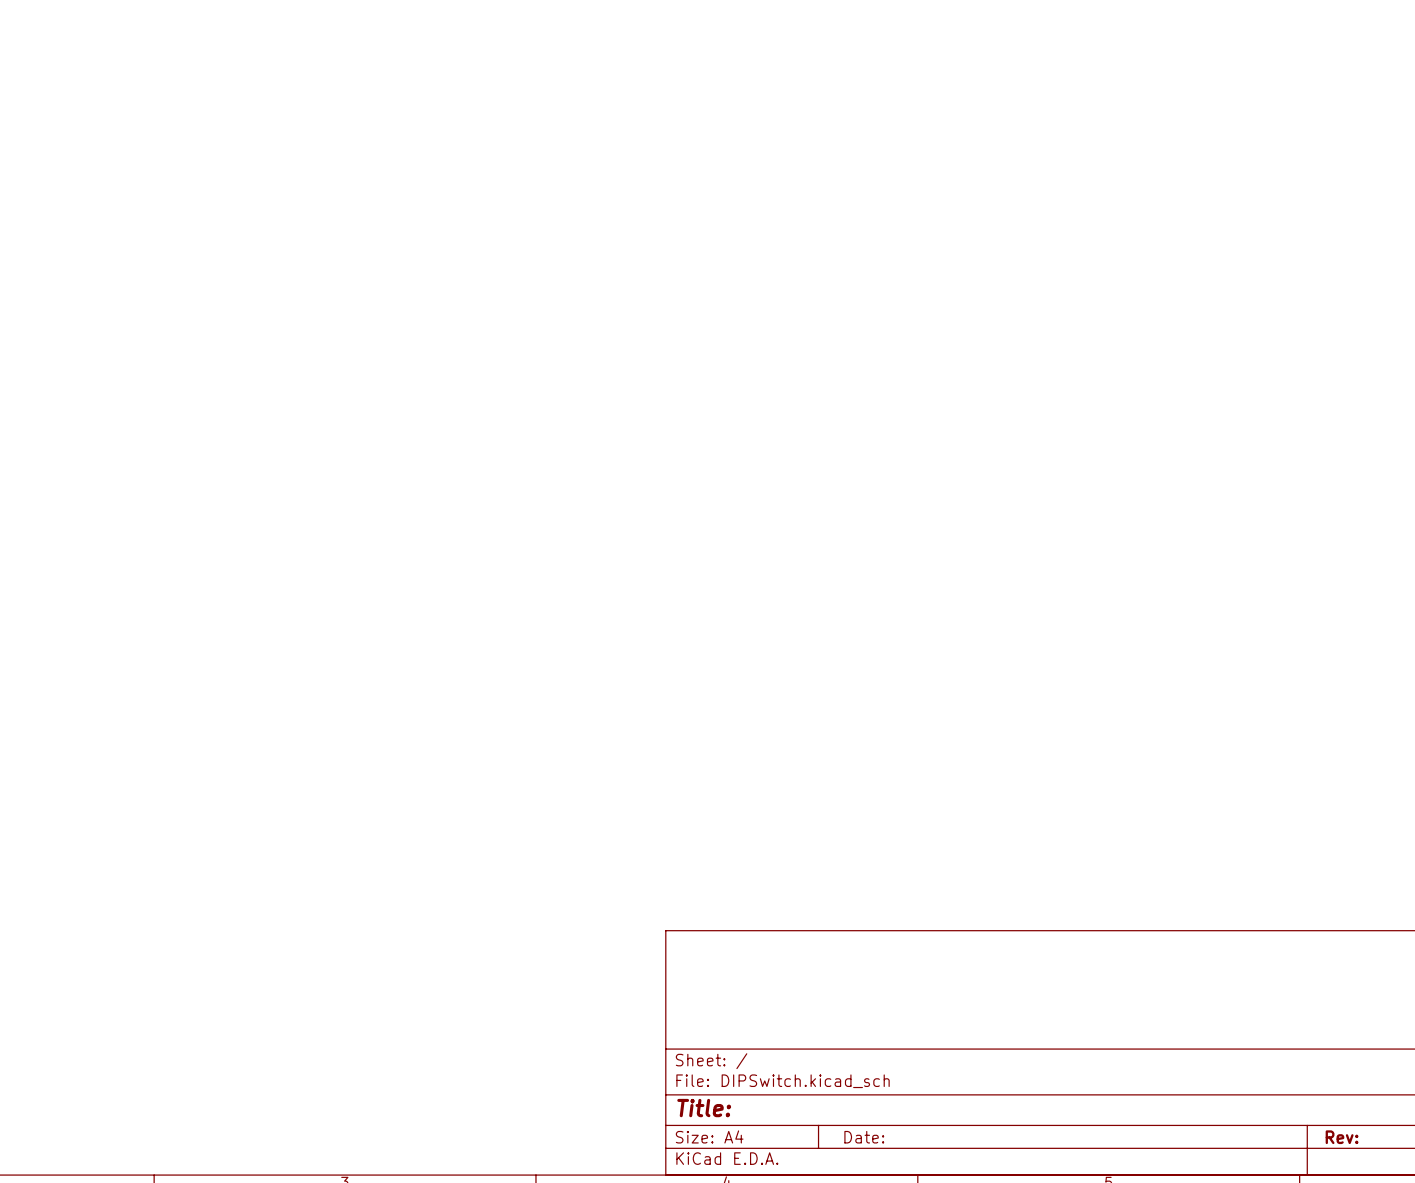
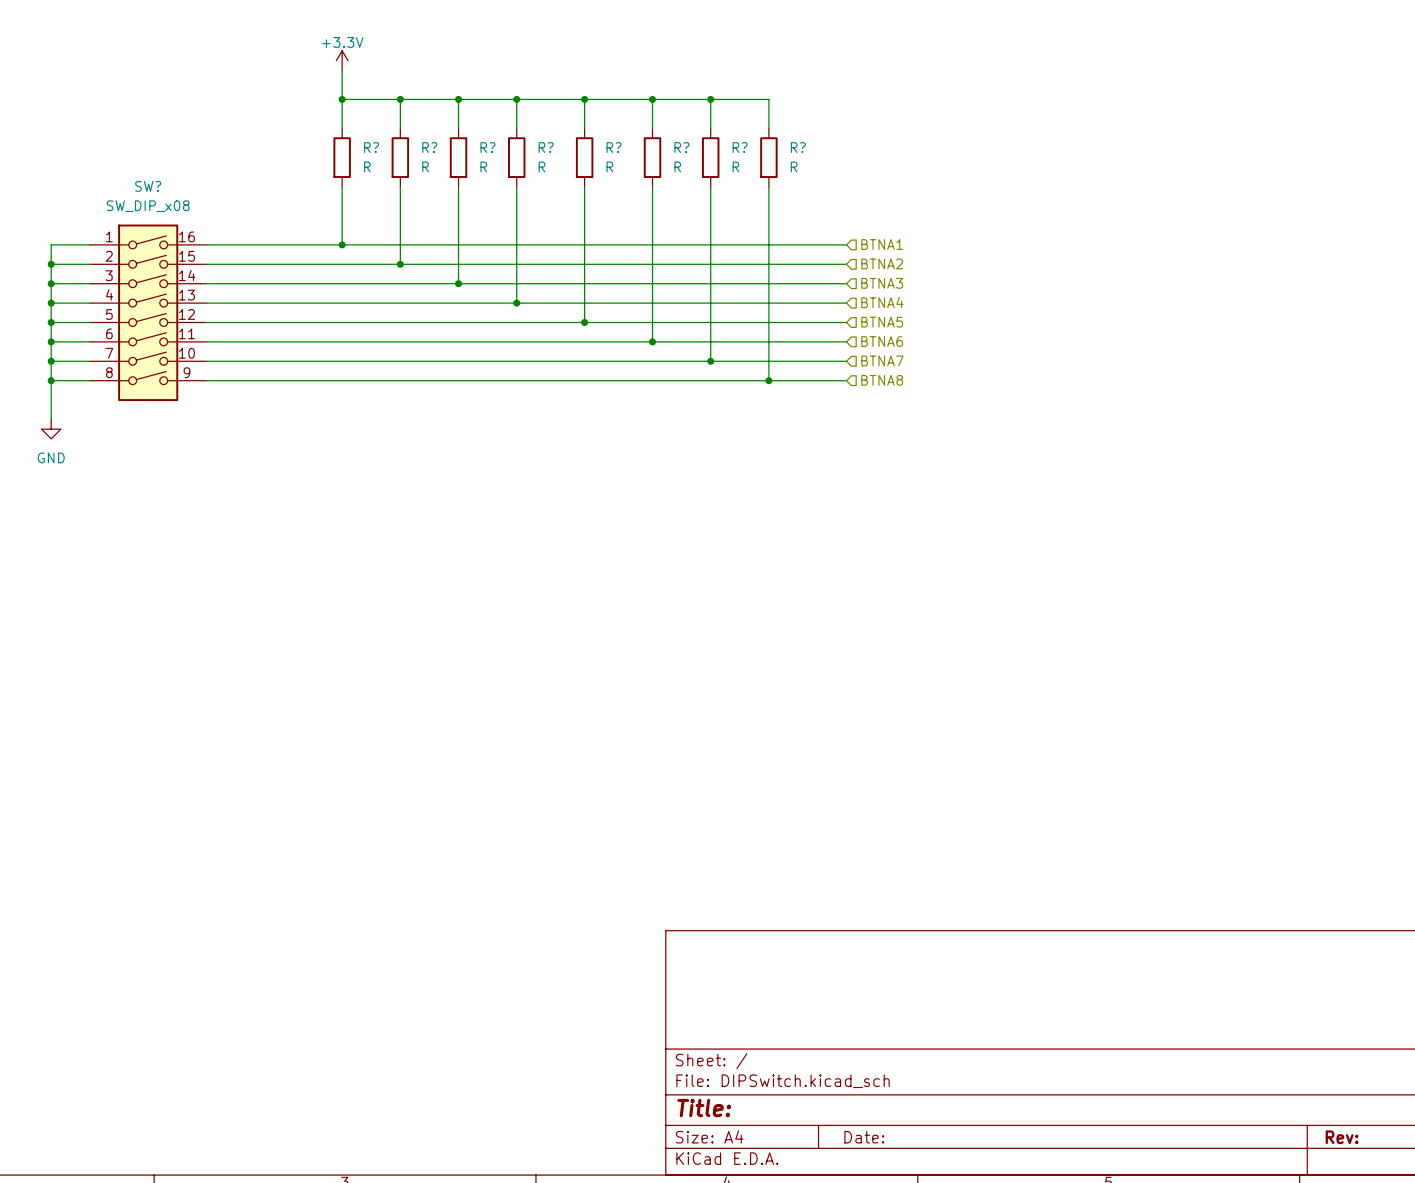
power symbol: none -> +3.3V (342, 60)
wire: none -> (342, 70) (342, 128)
wire: none -> (342, 99) (768, 99) (768, 128)
junction: none -> (342, 99)
wire: none -> (400, 99) (400, 128)
junction: none -> (400, 99)
wire: none -> (458, 99) (458, 128)
junction: none -> (458, 99)
wire: none -> (516, 99) (516, 128)
junction: none -> (516, 99)
wire: none -> (584, 99) (584, 128)
junction: none -> (584, 99)
wire: none -> (652, 99) (652, 128)
junction: none -> (652, 99)
wire: none -> (710, 99) (710, 128)
junction: none -> (710, 99)
R?: none -> R (342, 157)
R?: none -> R (400, 157)
R?: none -> R (458, 157)
R?: none -> R (516, 157)
R?: none -> R (584, 157)
R?: none -> R (652, 157)
R?: none -> R (710, 157)
R?: none -> R (768, 157)
wire: none -> (342, 186) (342, 244)
wire: none -> (400, 186) (400, 264)
wire: none -> (458, 186) (458, 283)
wire: none -> (516, 186) (516, 303)
wire: none -> (584, 186) (584, 322)
wire: none -> (652, 186) (652, 341)
wire: none -> (710, 186) (710, 361)
wire: none -> (768, 186) (768, 380)
wire: none -> (89, 244) (51, 244) (51, 419)
wire: none -> (206, 244) (846, 244)
junction: none -> (342, 244)
hierarchical label: none -> BTNA1 (882, 244)
hierarchical label: none -> BTNA2 (882, 263)
wire: none -> (51, 264) (89, 264)
junction: none -> (51, 264)
wire: none -> (206, 264) (846, 264)
junction: none -> (400, 264)
wire: none -> (51, 283) (89, 283)
junction: none -> (51, 283)
wire: none -> (206, 283) (846, 283)
junction: none -> (458, 283)
hierarchical label: none -> BTNA3 (882, 283)
hierarchical label: none -> BTNA4 (882, 302)
wire: none -> (51, 303) (89, 303)
junction: none -> (51, 303)
wire: none -> (206, 303) (846, 303)
junction: none -> (516, 303)
SW?: none -> SW_DIP_x08 (148, 312)
wire: none -> (51, 322) (89, 322)
junction: none -> (51, 322)
wire: none -> (206, 322) (846, 322)
junction: none -> (584, 322)
hierarchical label: none -> BTNA5 (882, 322)
wire: none -> (51, 341) (89, 341)
junction: none -> (51, 341)
wire: none -> (206, 341) (846, 341)
junction: none -> (652, 341)
hierarchical label: none -> BTNA6 (882, 341)
hierarchical label: none -> BTNA7 (882, 360)
wire: none -> (51, 361) (89, 361)
junction: none -> (51, 361)
wire: none -> (206, 361) (846, 361)
junction: none -> (710, 361)
wire: none -> (51, 380) (89, 380)
junction: none -> (51, 380)
wire: none -> (206, 380) (846, 380)
junction: none -> (768, 380)
hierarchical label: none -> BTNA8 (882, 380)
power symbol: none -> GND (51, 429)

